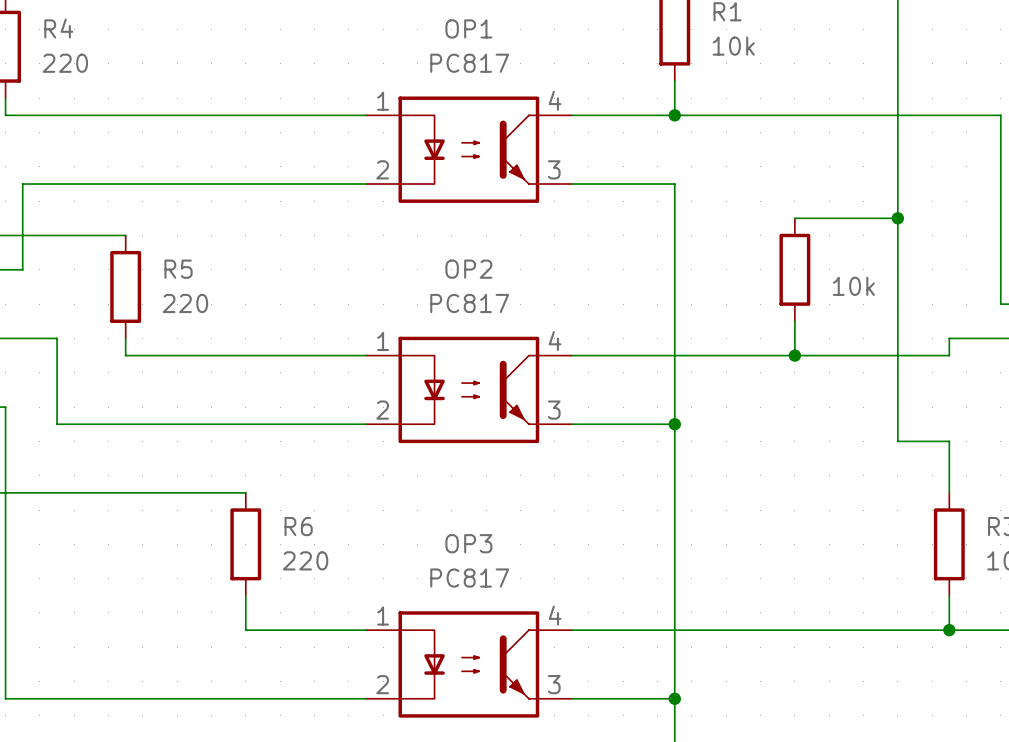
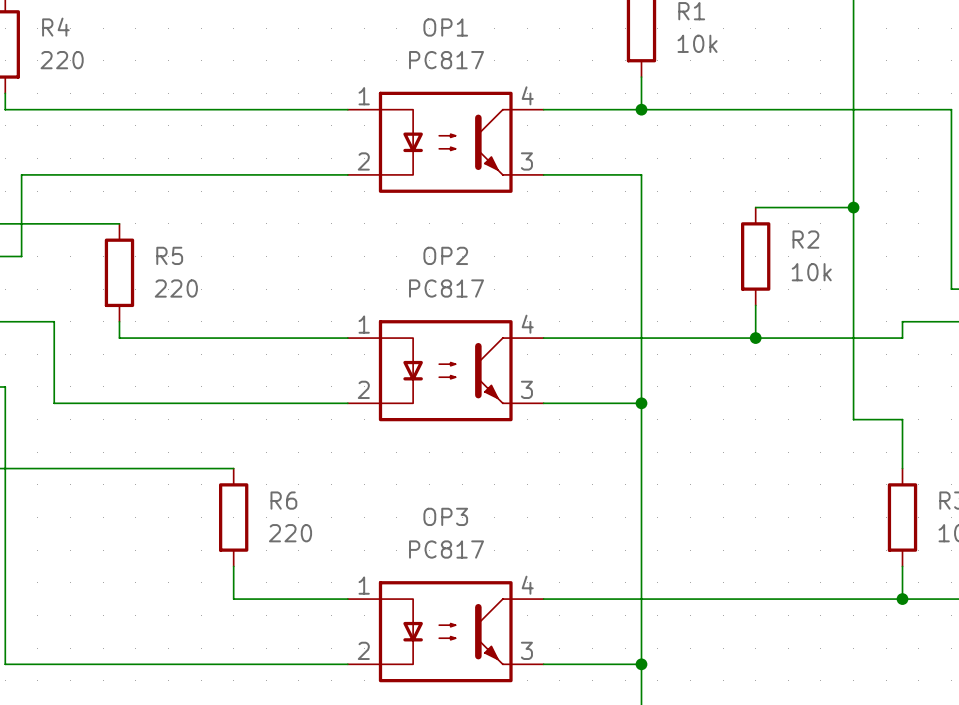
R2 name: none -> R2 (805, 239)

